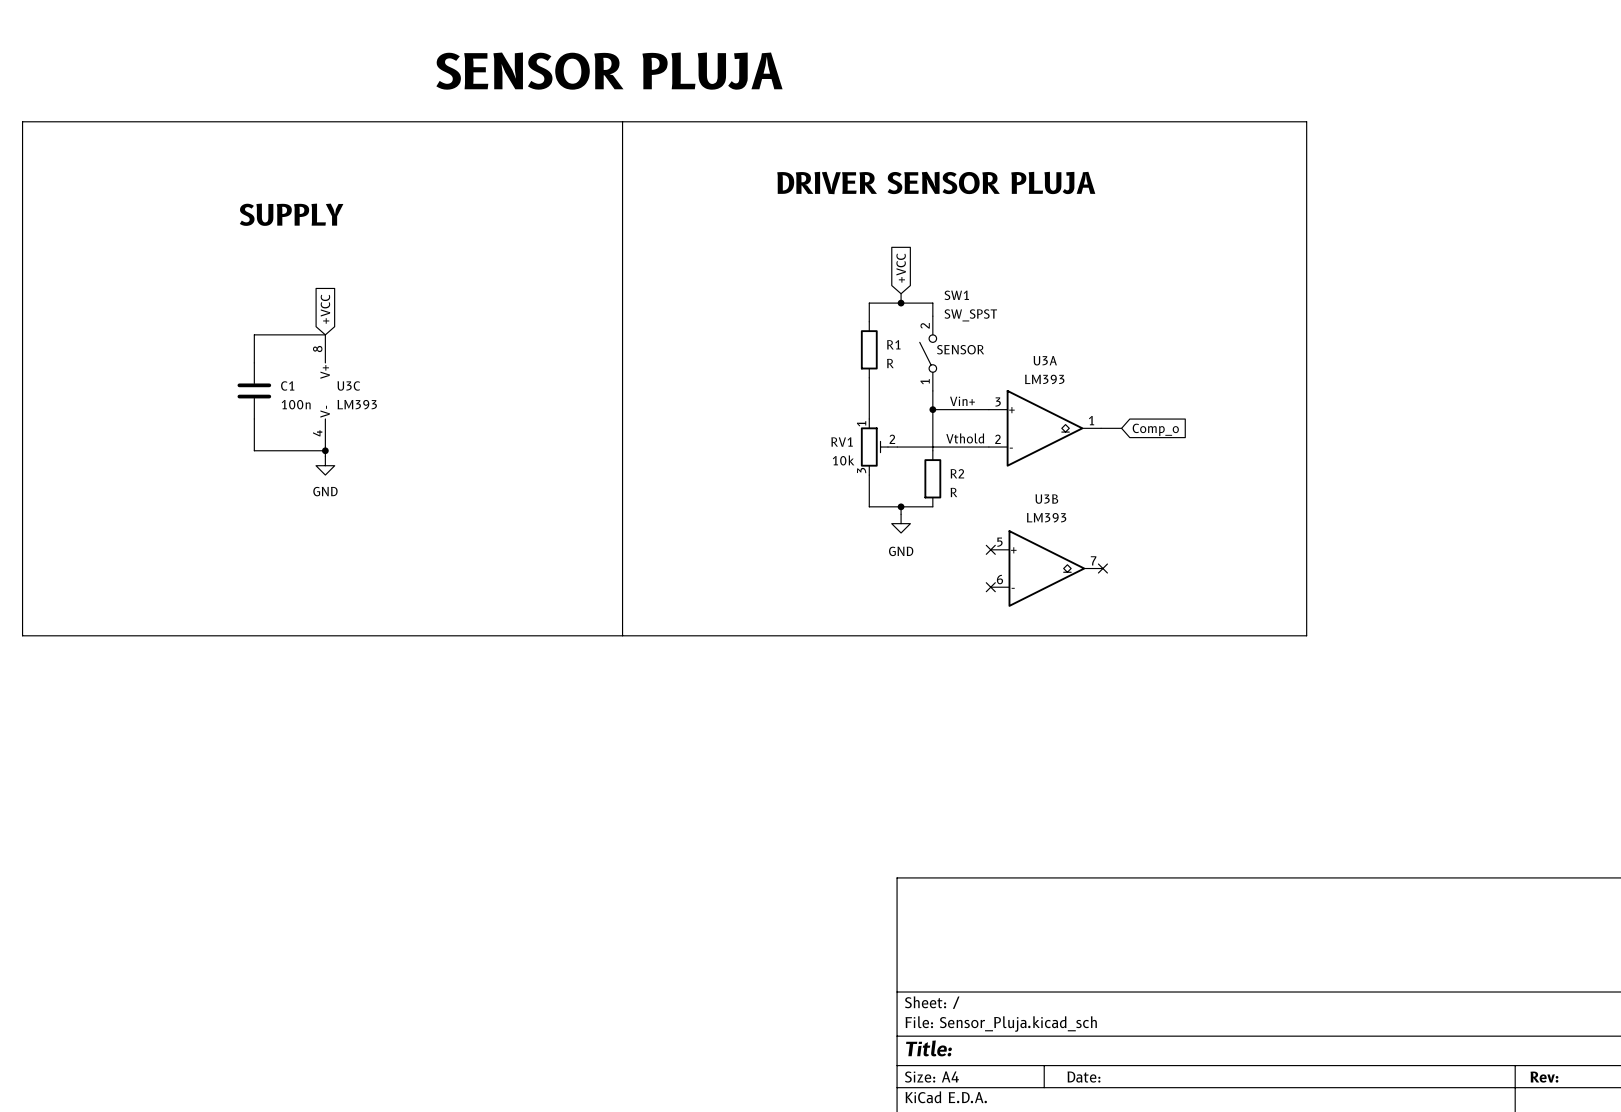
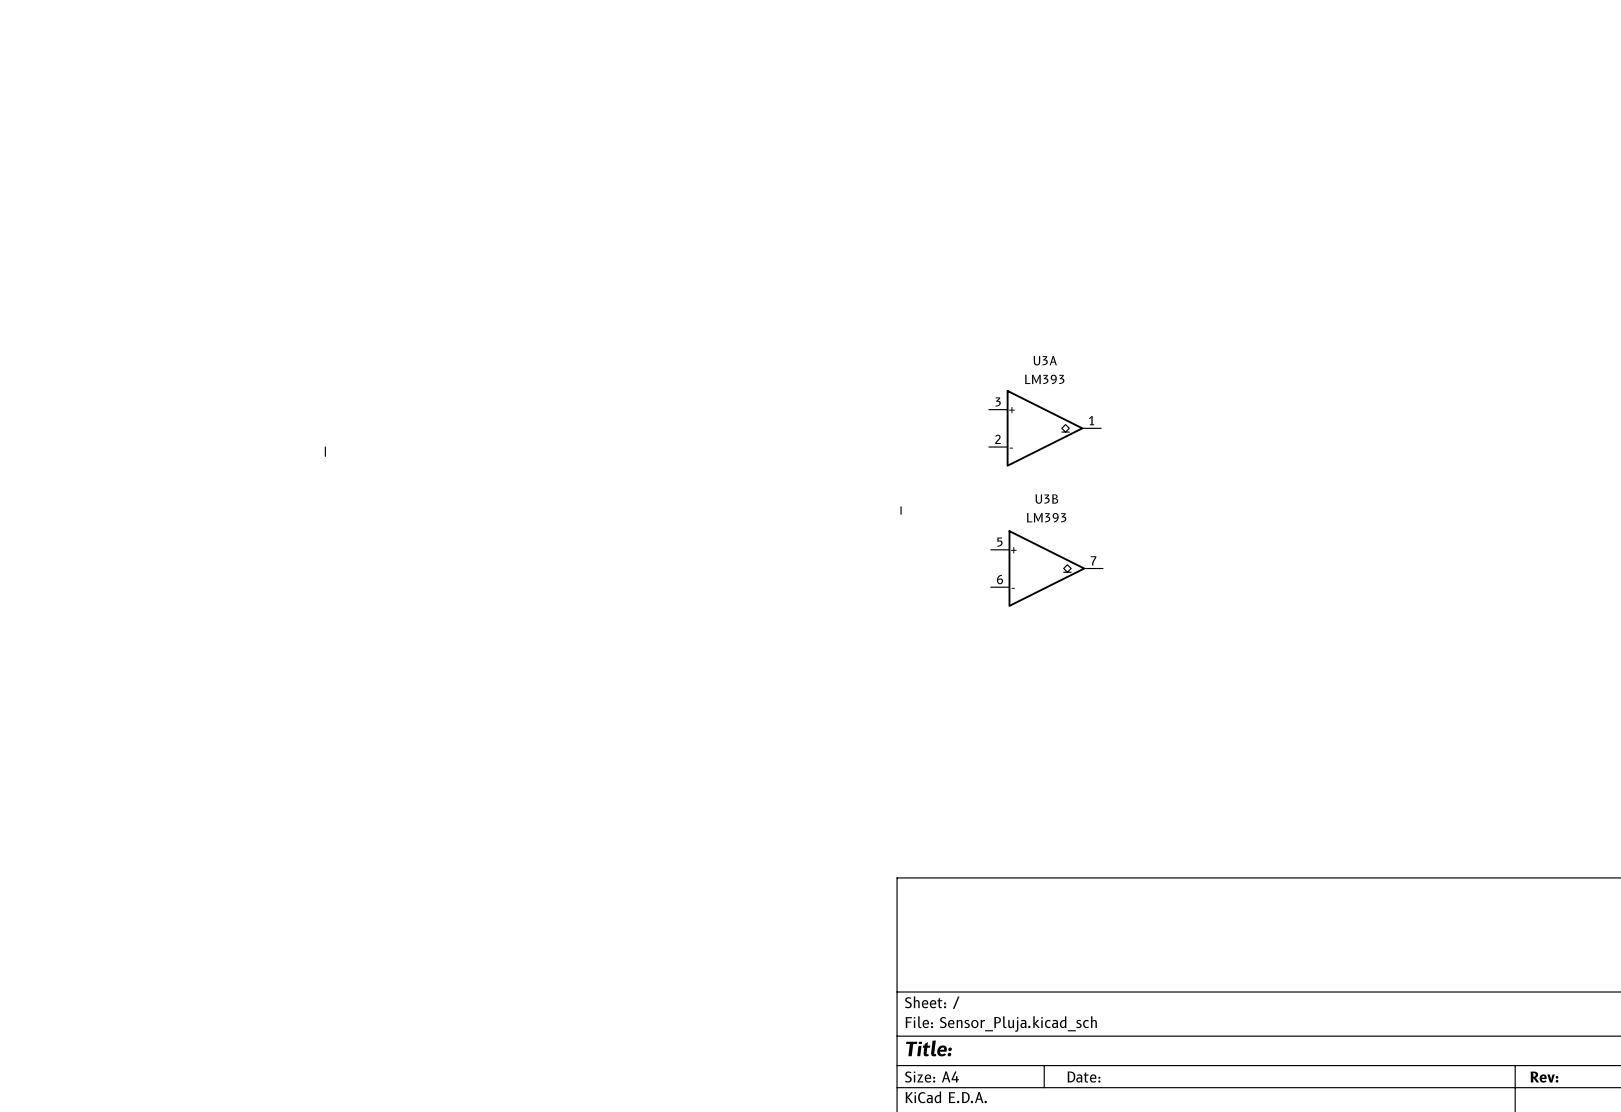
text: SENSOR PLUJA (609, 71) -> none
line: (22, 121) (1306, 121) (1306, 635) (22, 635) (22, 121) -> none
line: (622, 121) (622, 635) -> none
text: DRIVER SENSOR PLUJA (936, 183) -> none
text: SUPPLY (291, 214) -> none
global label: +VCC (901, 268) -> none
wire: (901, 293) (901, 303) -> none
junction: (901, 303) -> none
global label: +VCC (325, 309) -> none
wire: (932, 316) (932, 303) (869, 303) (869, 321) -> none
wire: (325, 334) (254, 334) (254, 362) -> none
R1: R (869, 349) -> none
text: SENSOR (960, 349) -> none
SW1: SW_SPST (928, 353) -> none
wire: (869, 377) (869, 418) -> none
C1: 100n (254, 390) -> none
U3C: LM393 (325, 390) -> none
wire: (932, 390) (932, 450) -> none
label: Vin+ (962, 401) -> none
wire: (932, 409) (988, 409) -> none
junction: (932, 409) -> none
wire: (254, 418) (254, 450) (325, 450) -> none
wire: (1101, 428) (1121, 428) -> none
global label: Comp_o (1155, 429) -> none
label: Vthold (965, 438) -> none
RV1: 10k (879, 447) -> none
wire: (897, 447) (988, 447) -> none
junction: (325, 450) -> none
power symbol: GND (325, 465) -> none
wire: (869, 475) (869, 506) (932, 506) -> none
R2: R (932, 478) -> none
junction: (901, 506) -> none
power symbol: GND (901, 523) -> none
no-connect mark: (990, 549) -> none
no-connect mark: (1102, 568) -> none
no-connect mark: (990, 587) -> none

